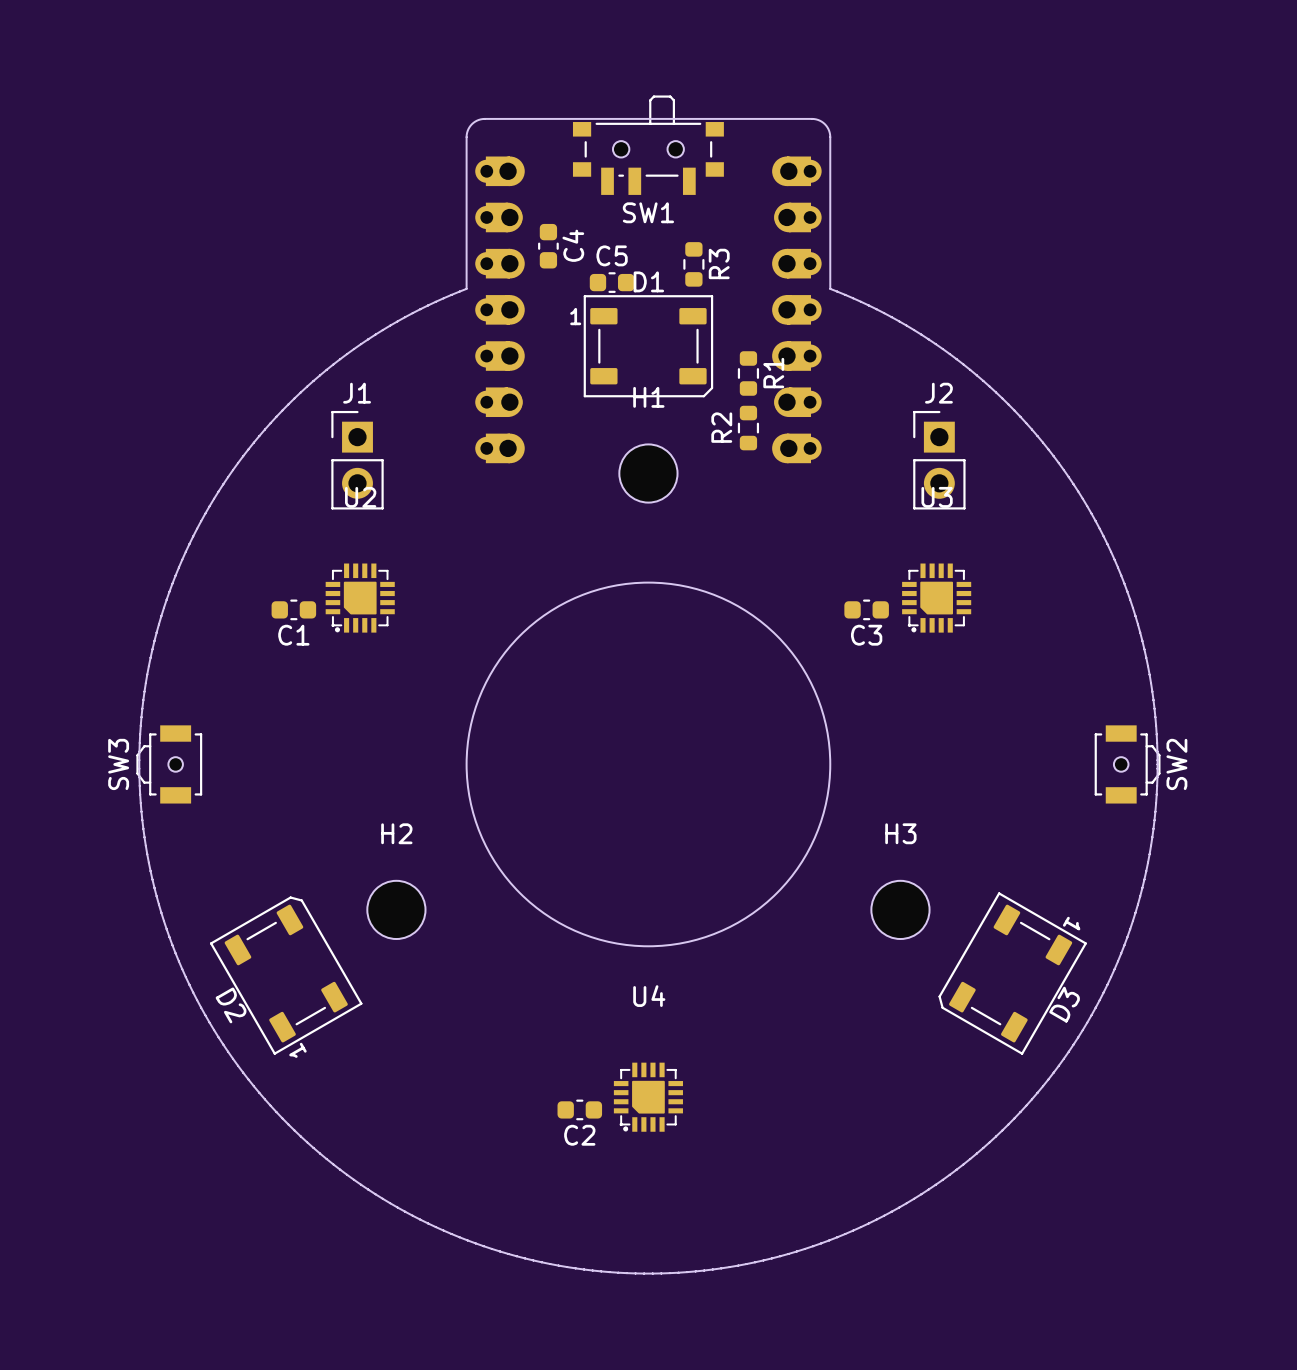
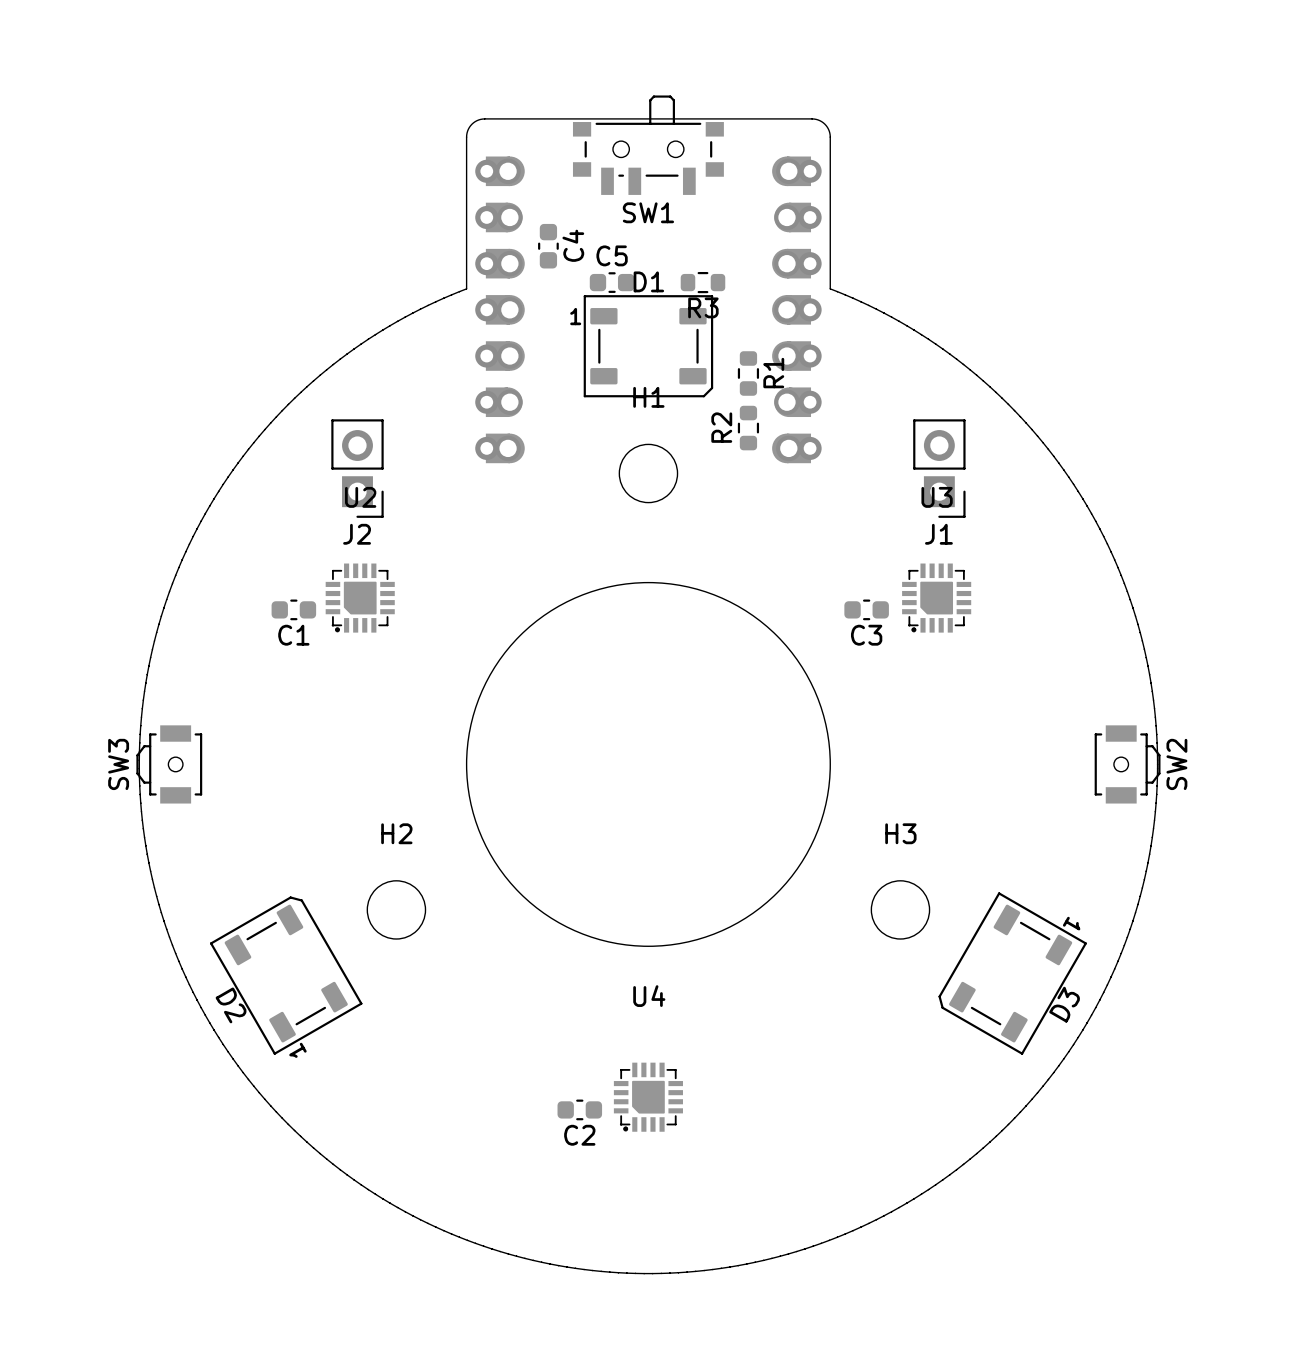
R3 rotation: 0° (693, 264) -> 90° clockwise (702, 282)
J1 rotation: 0° (357, 460) -> 180° (939, 468)
J1 position: (357, 460) -> (939, 468)
J2 rotation: 0° (939, 460) -> 180° (357, 468)
J2 position: (939, 460) -> (357, 468)

